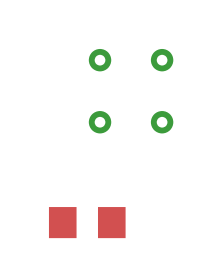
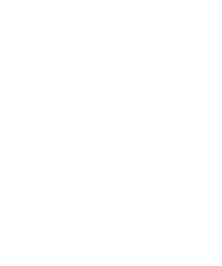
part: (131, 91) -> none
part: (87, 222) -> none

